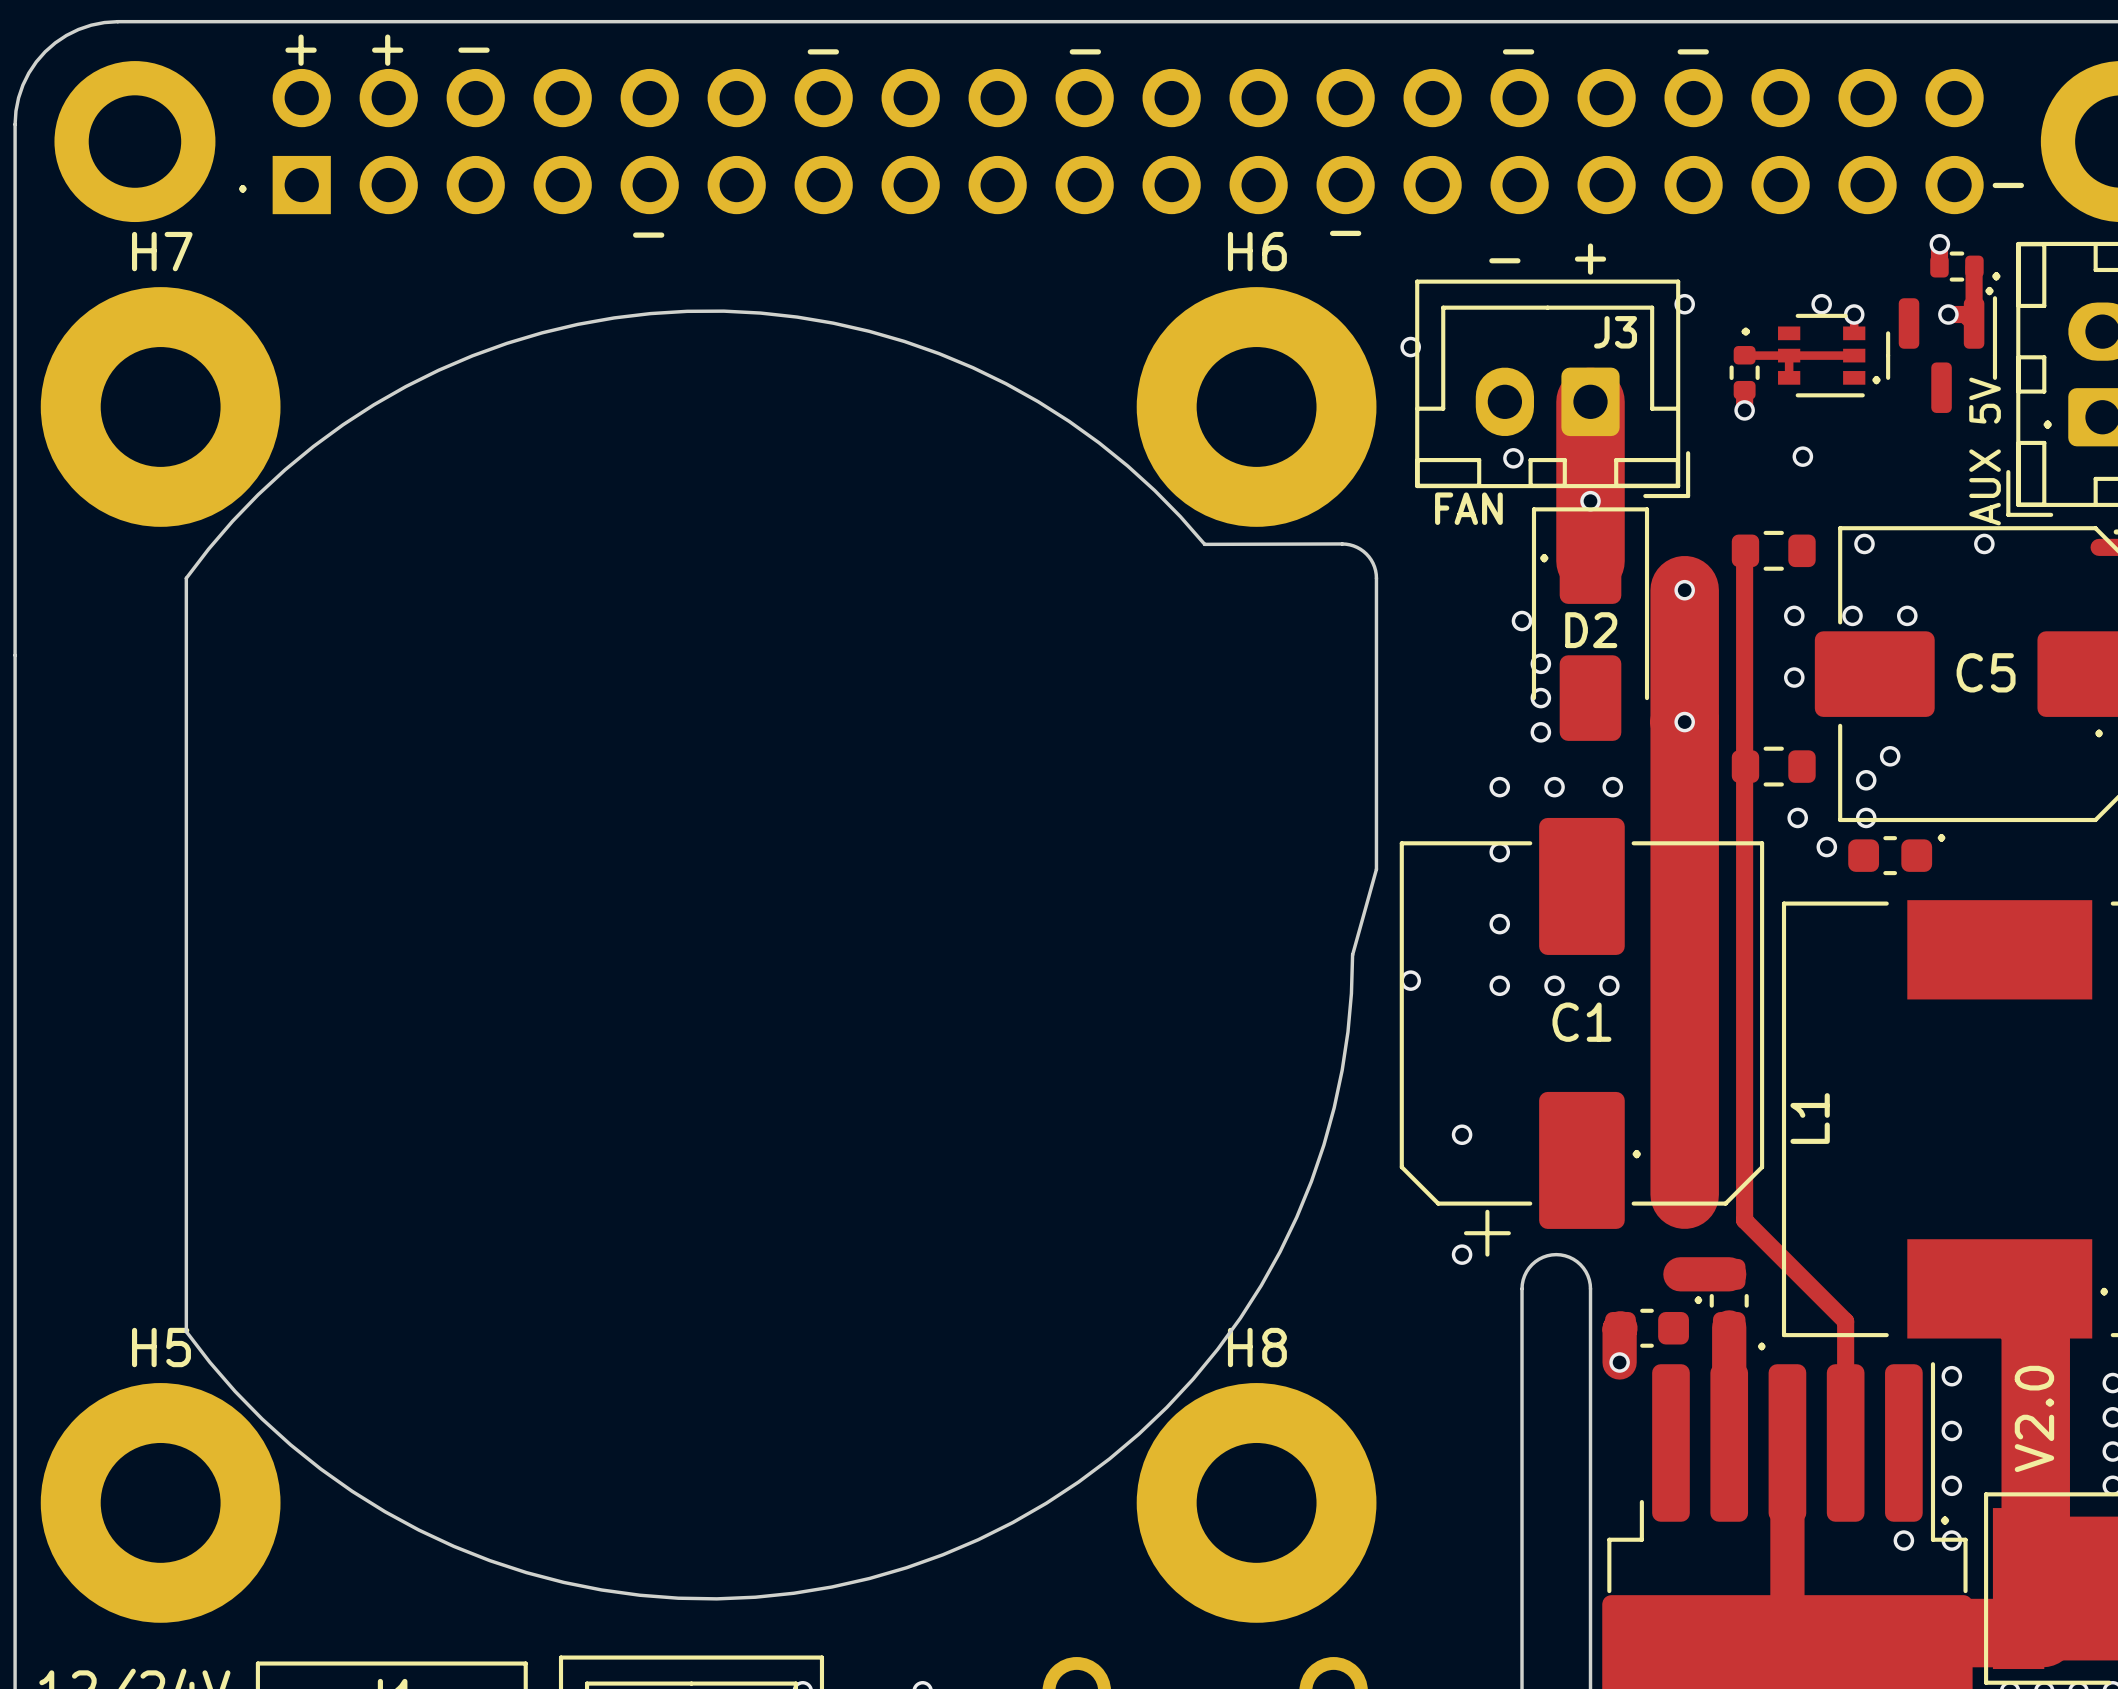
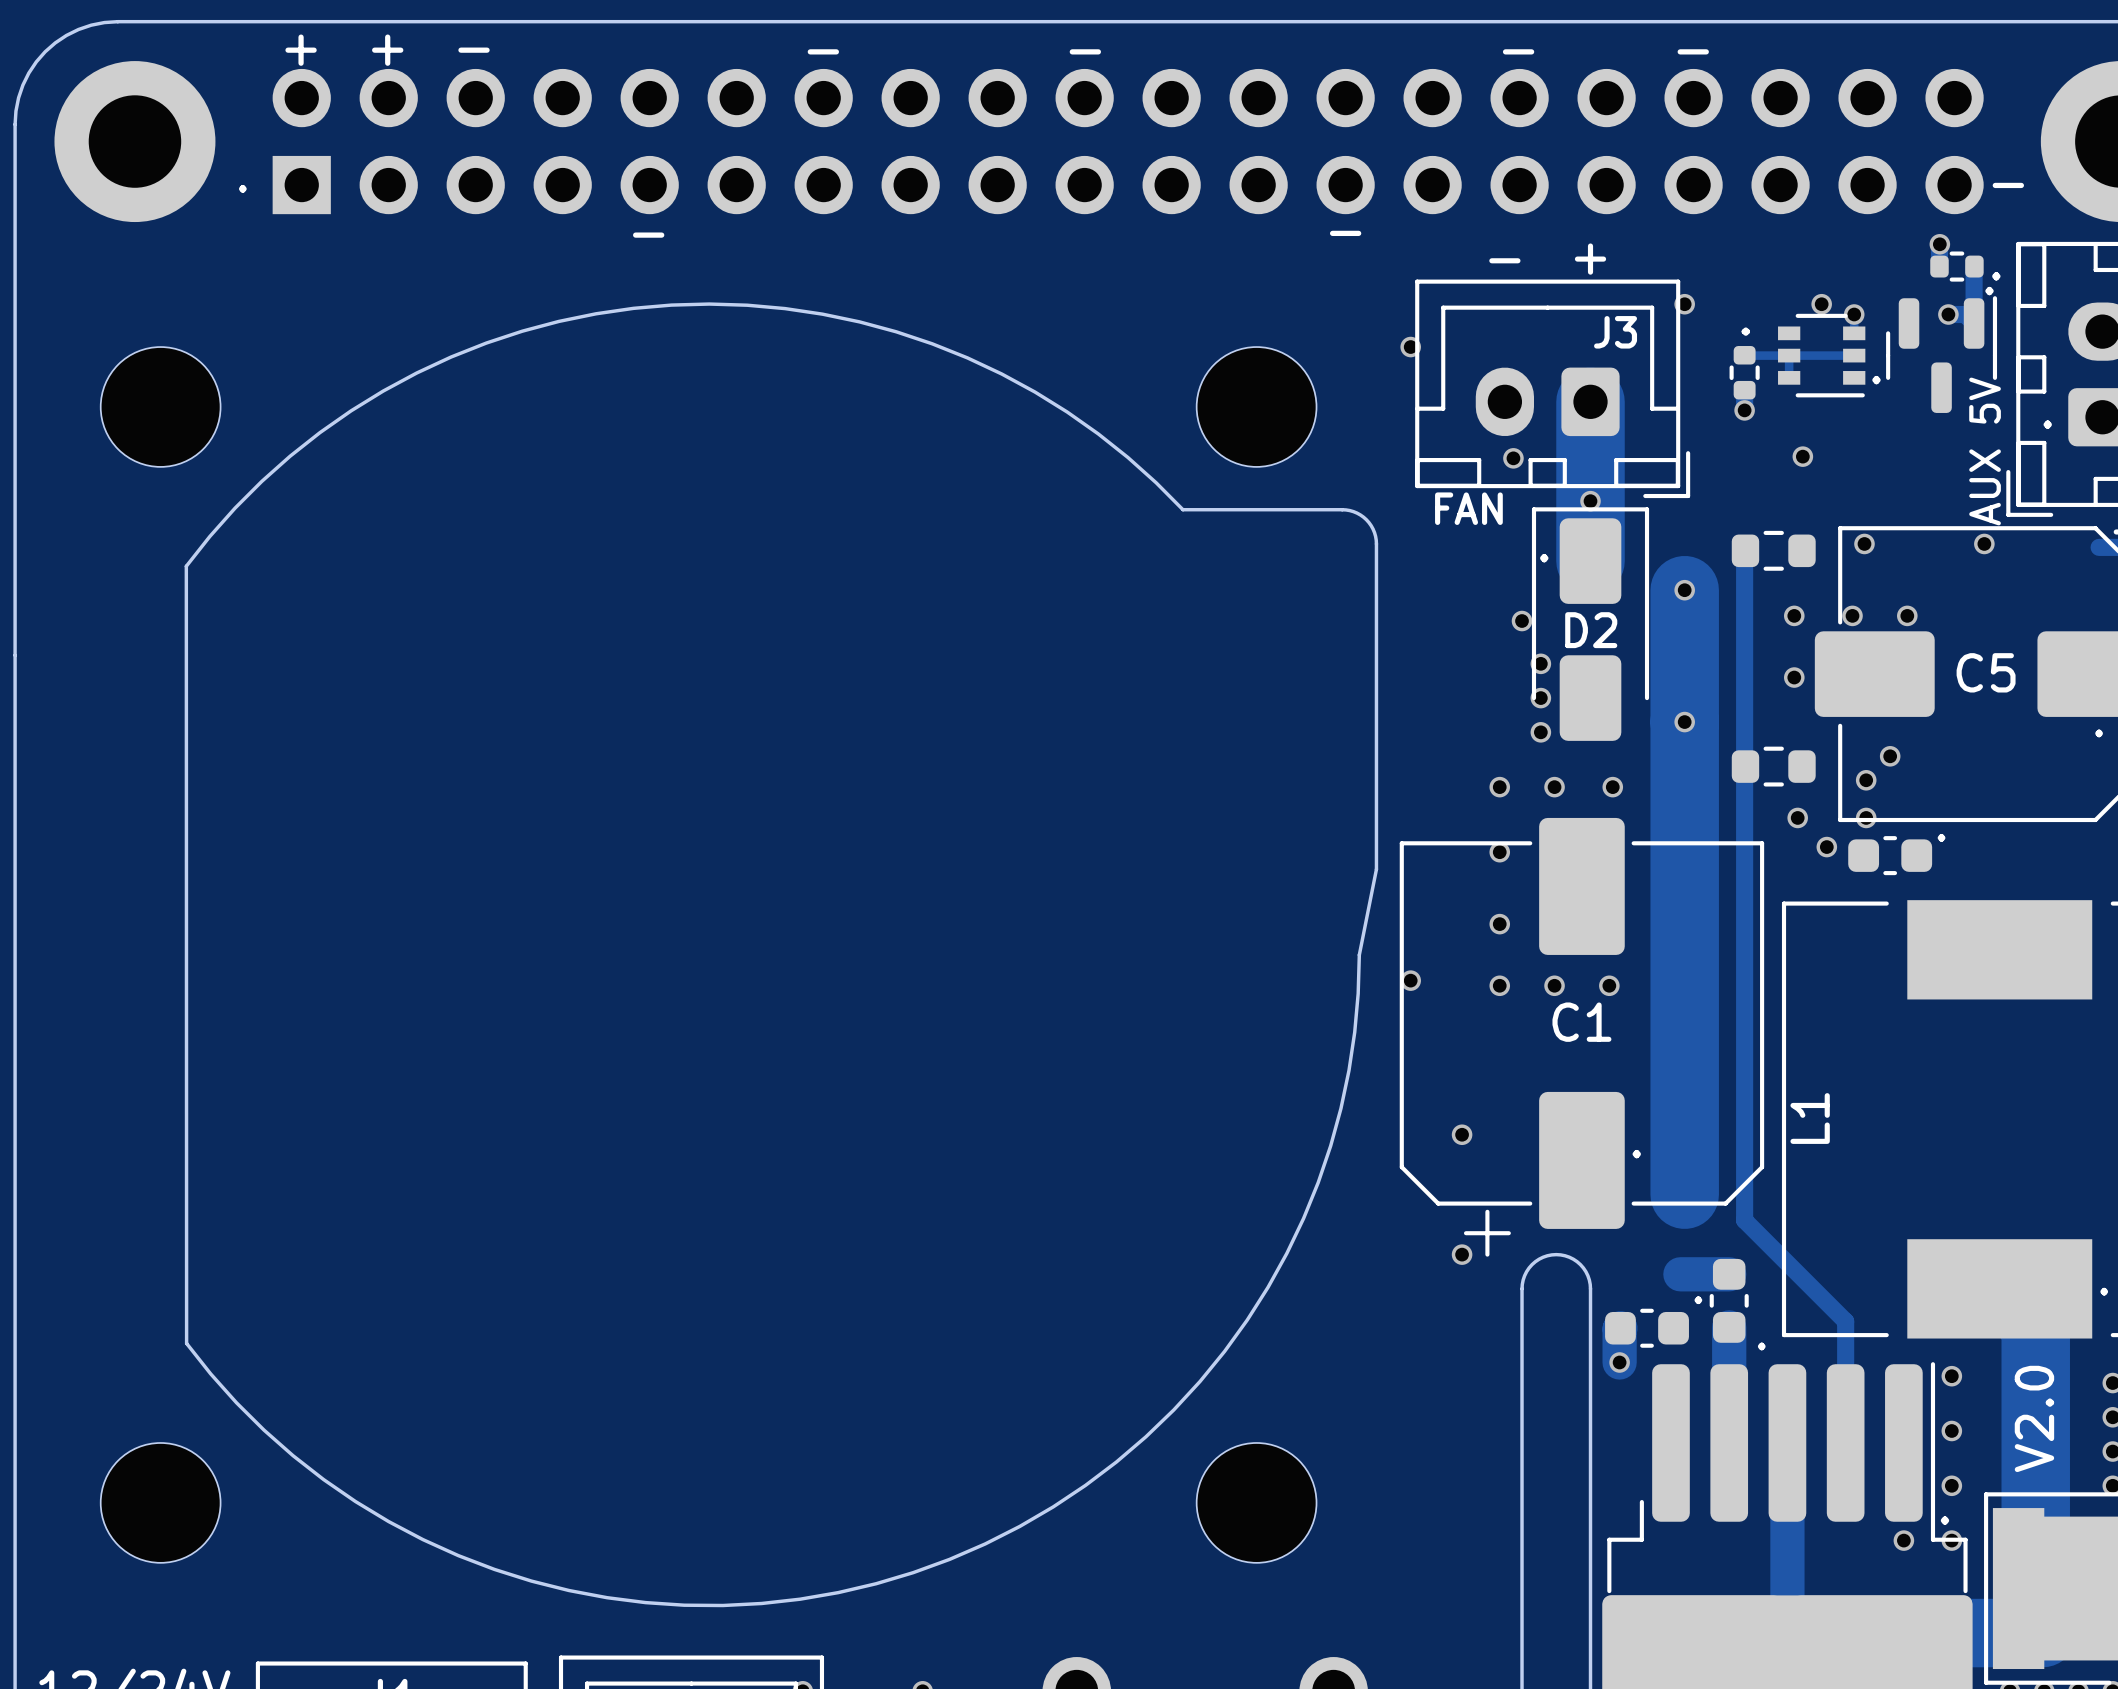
H7: (160, 406) -> none
part: none -> (160, 406)
H6: (1256, 406) -> none
part: none -> (1256, 406)
board edge: (1376, 578) (1374, 566) (1368, 556) (1360, 549) (1349, 544) (1204, 544) (1180, 516) (1127, 465) (1069, 421) (1038, 401) (1006, 383) (939, 353) (869, 331) (833, 323) (760, 313) (723, 311) (650, 313) (614, 317) (542, 332) (506, 343) (438, 370) (373, 404) (313, 446) (285, 469) (232, 521) (186, 578) (186, 1331) (235, 1391) (262, 1418) (290, 1444) (352, 1491) (418, 1530) (453, 1546) (526, 1572) (601, 1589) (639, 1595) (716, 1598) (755, 1597) (793, 1593) (869, 1578) (942, 1554) (1012, 1522) (1046, 1503) (1078, 1482) (1138, 1434) (1193, 1379) (1240, 1318) (1261, 1285) (1296, 1217) (1323, 1145) (1342, 1070) (1347, 1031) (1352, 954) (1376, 869) -> (1376, 578) (1374, 532) (1366, 519) (1357, 513) (1342, 509) (1182, 509) (1127, 457) (1067, 412) (1035, 392) (1001, 374) (932, 343) (896, 331) (822, 314) (747, 305) (709, 304) (671, 305) (596, 313) (522, 331) (486, 343) (416, 373) (351, 410) (319, 432) (261, 481) (235, 508) (186, 566) (186, 1343) (236, 1402) (263, 1430) (293, 1455) (355, 1501) (422, 1539) (494, 1569) (531, 1581) (569, 1590) (645, 1602) (722, 1605) (800, 1599) (838, 1592) (876, 1583) (949, 1559) (985, 1543) (1053, 1506) (1116, 1462) (1145, 1436) (1200, 1381) (1224, 1351) (1268, 1287) (1286, 1253) (1318, 1182) (1340, 1108) (1354, 1032) (1359, 954) (1376, 869)
H5: (160, 1502) -> none
part: none -> (160, 1502)
H8: (1256, 1502) -> none
part: none -> (1256, 1502)

